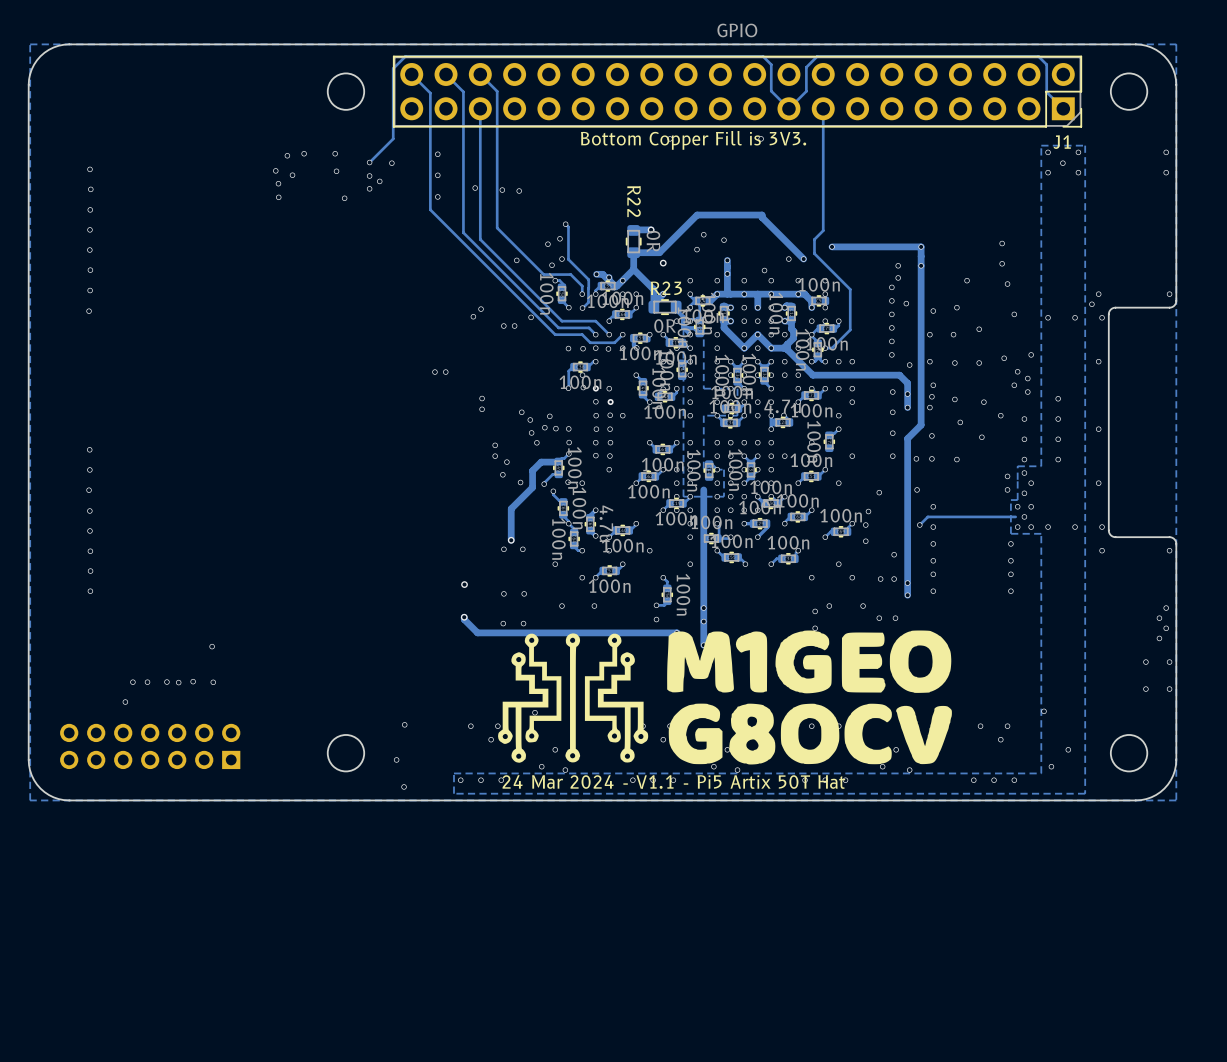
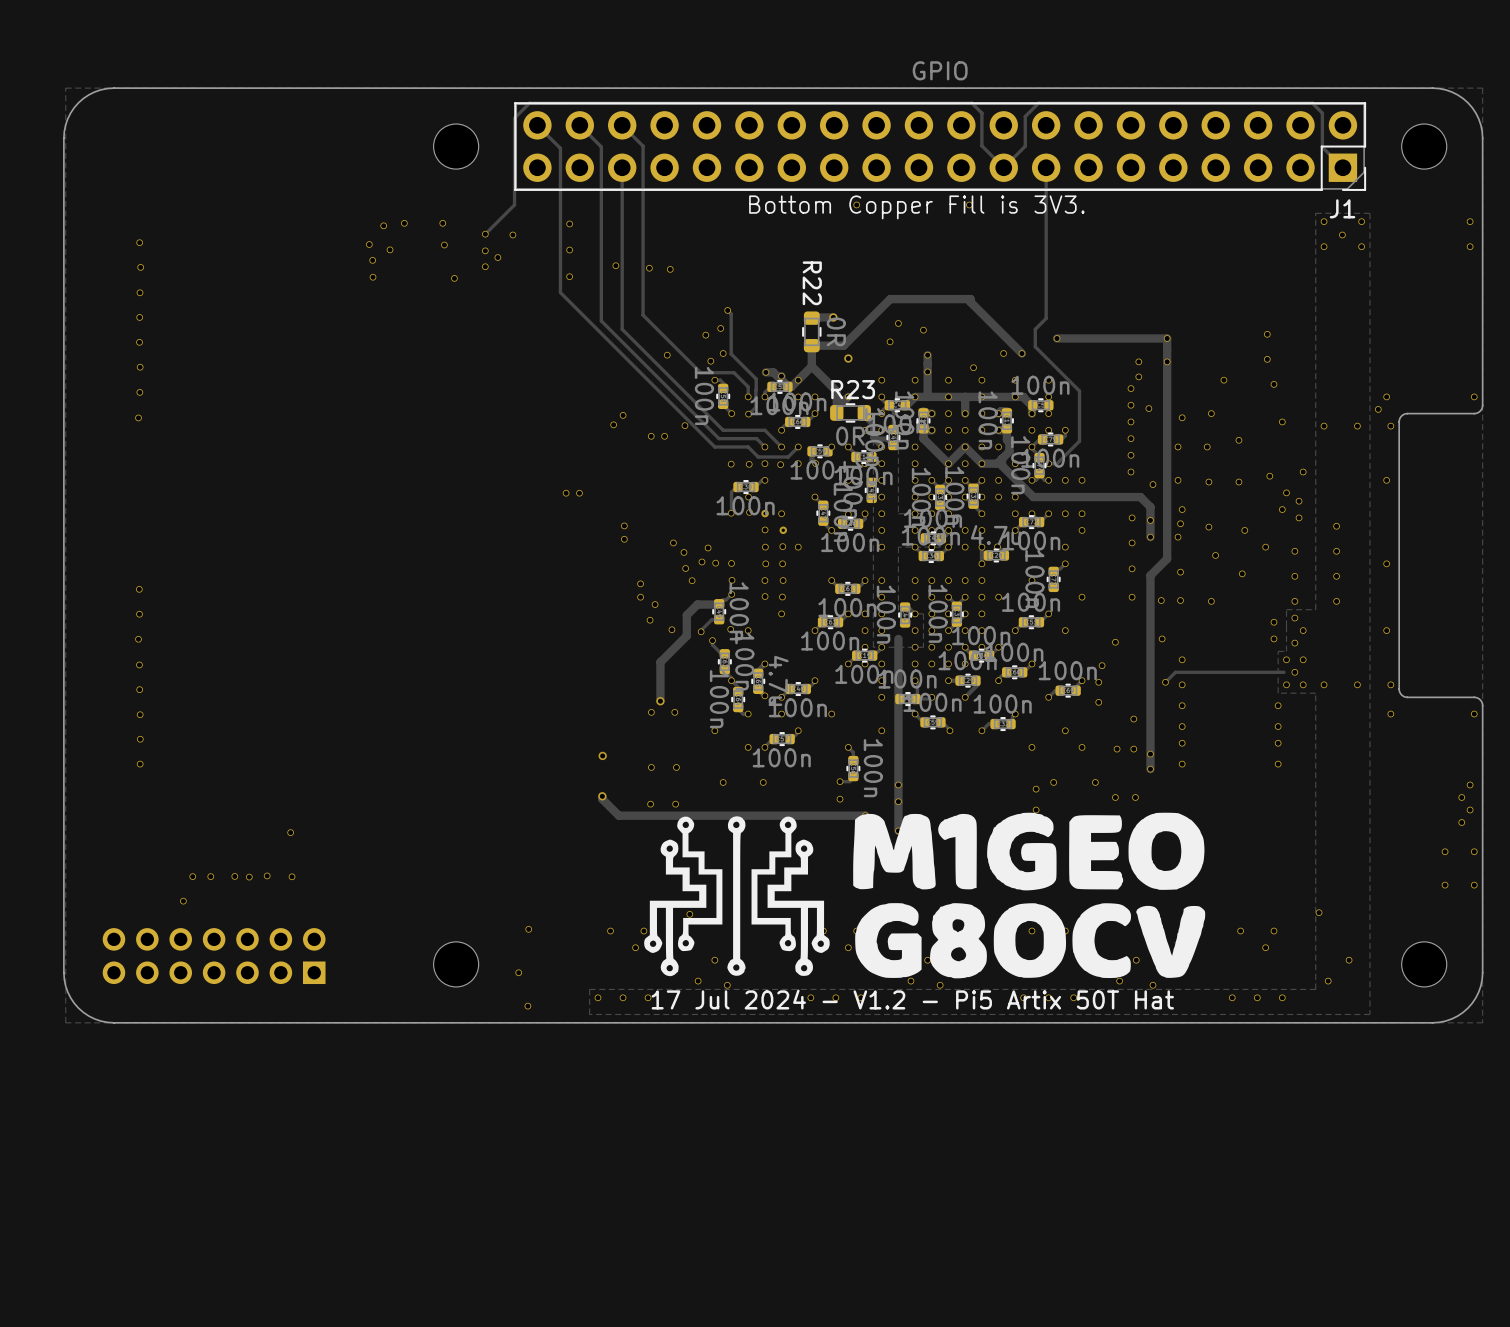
text: 24 Mar 2024 - V1.1 - Pi5 Artix 50T Hat (673, 782) -> 17 Jul 2024 - V1.2 - Pi5 Artix 50T Hat (912, 999)

